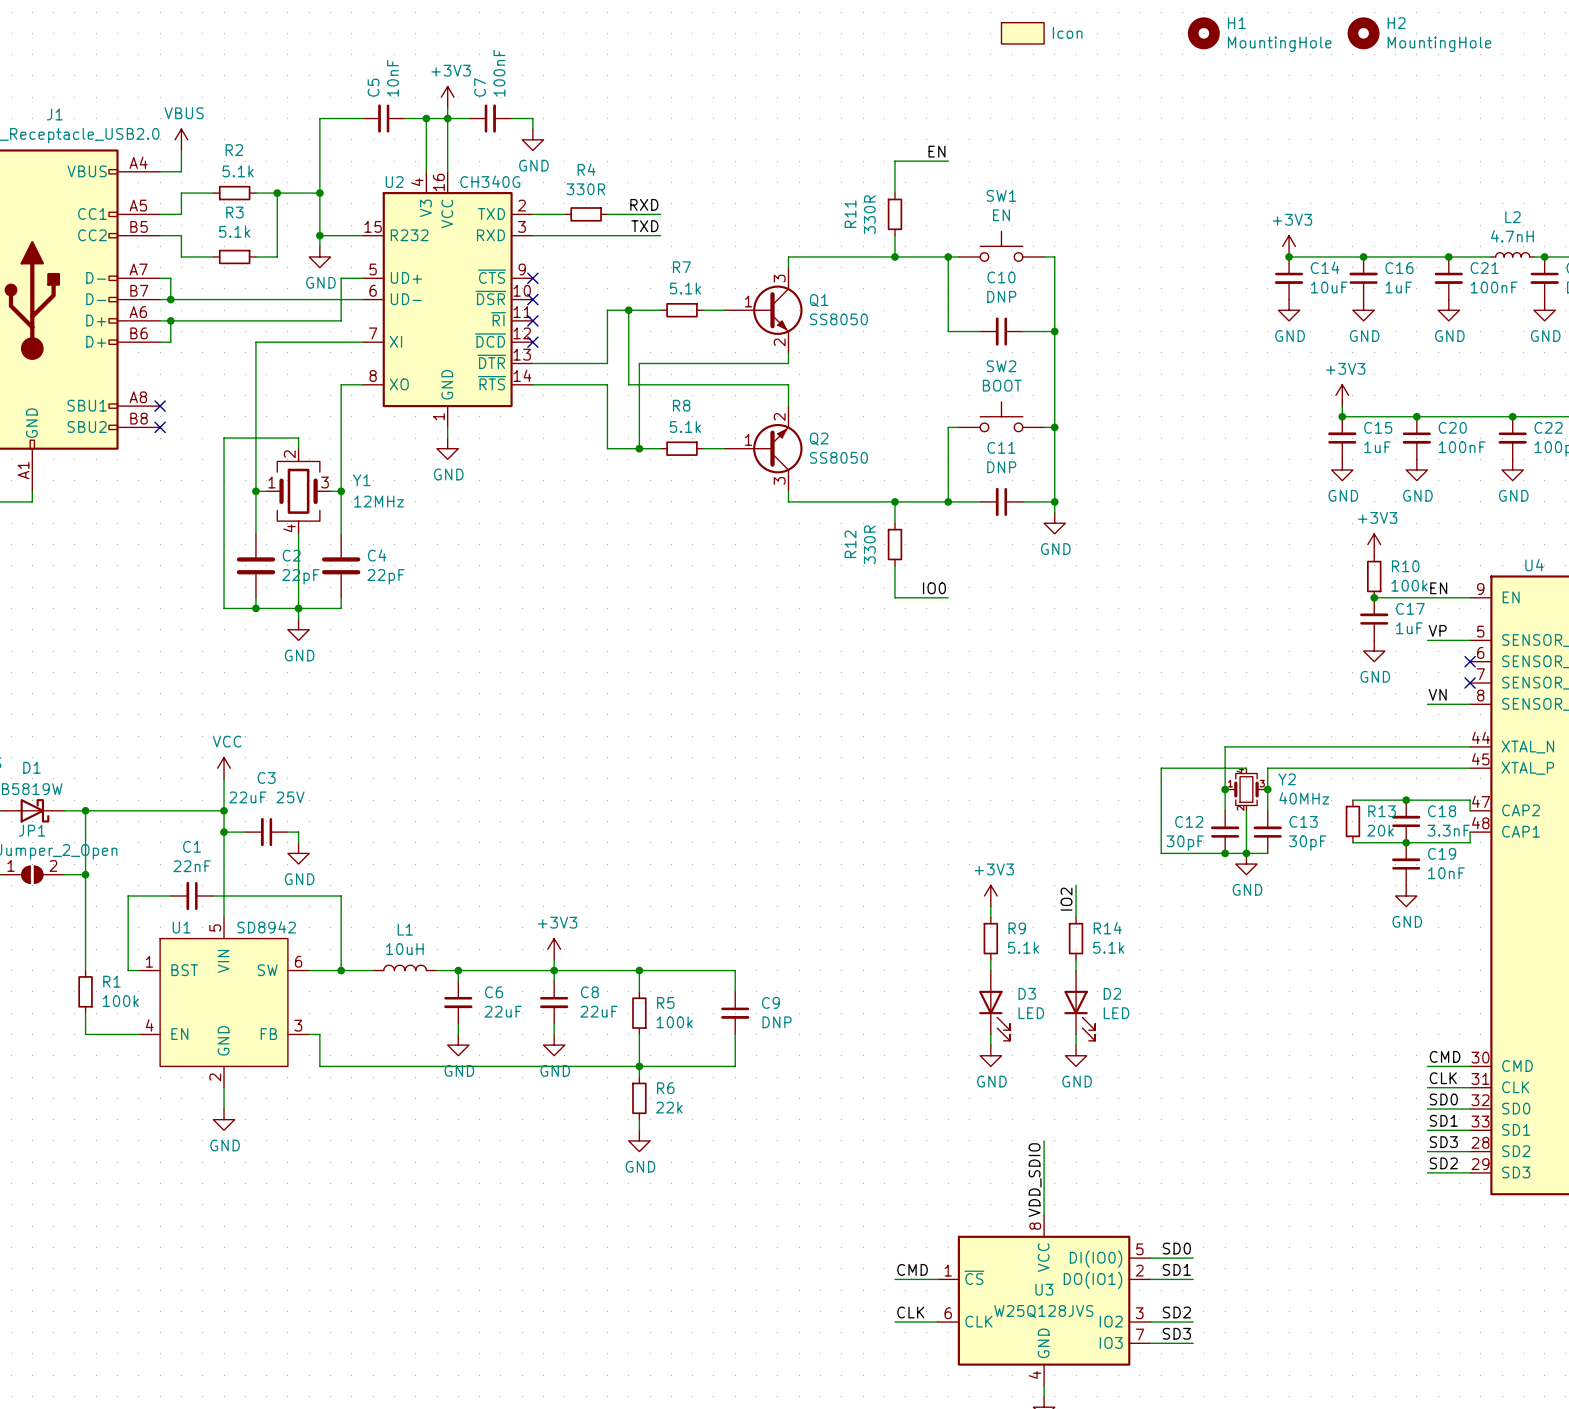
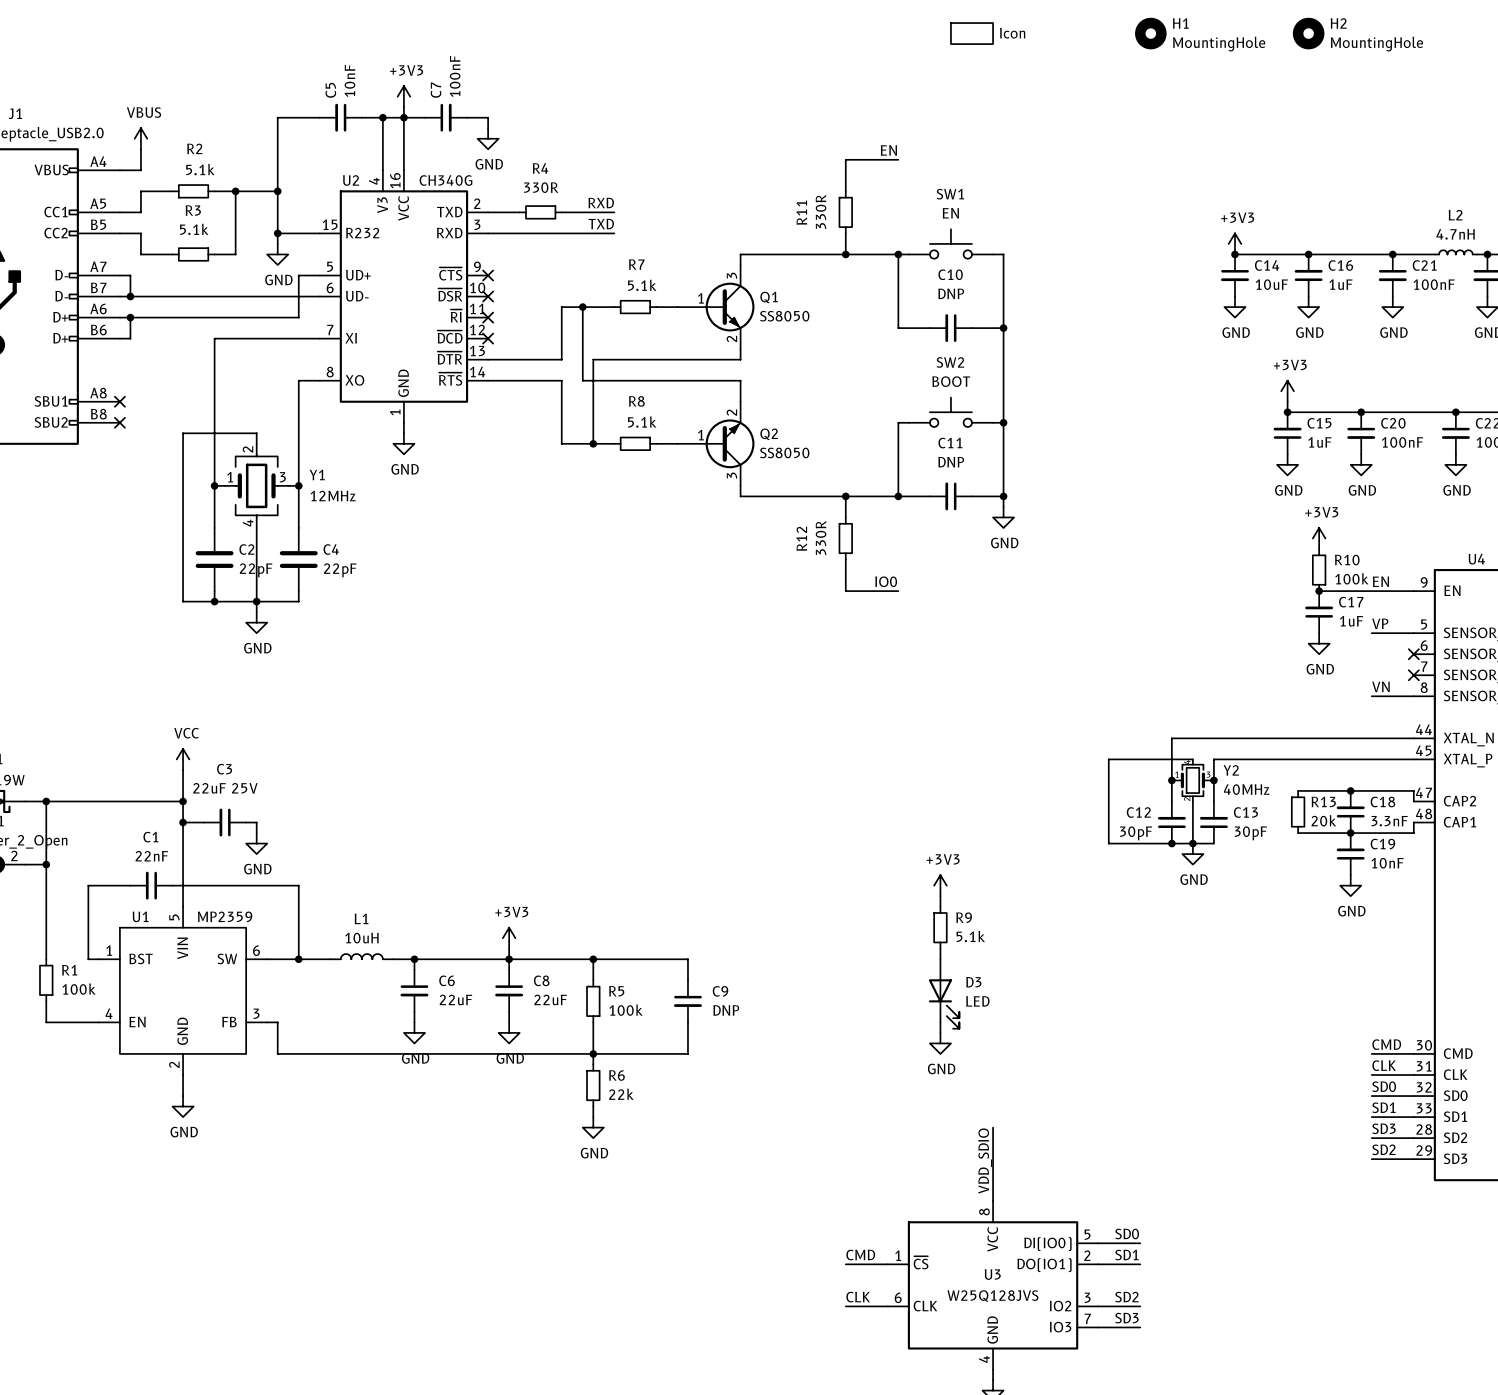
wire: (1076, 885) (1076, 917) -> none
label: IO2 (1066, 899) -> none
U1 value: SD8942 (266, 927) -> MP2359 (225, 916)
R14: 5.1k (1076, 938) -> none
wire: (1076, 959) (1076, 970) -> none
D2: LED (1079, 1005) -> none
wire: (1076, 1034) (1076, 1045) -> none
power symbol: GND (1076, 1055) -> none

